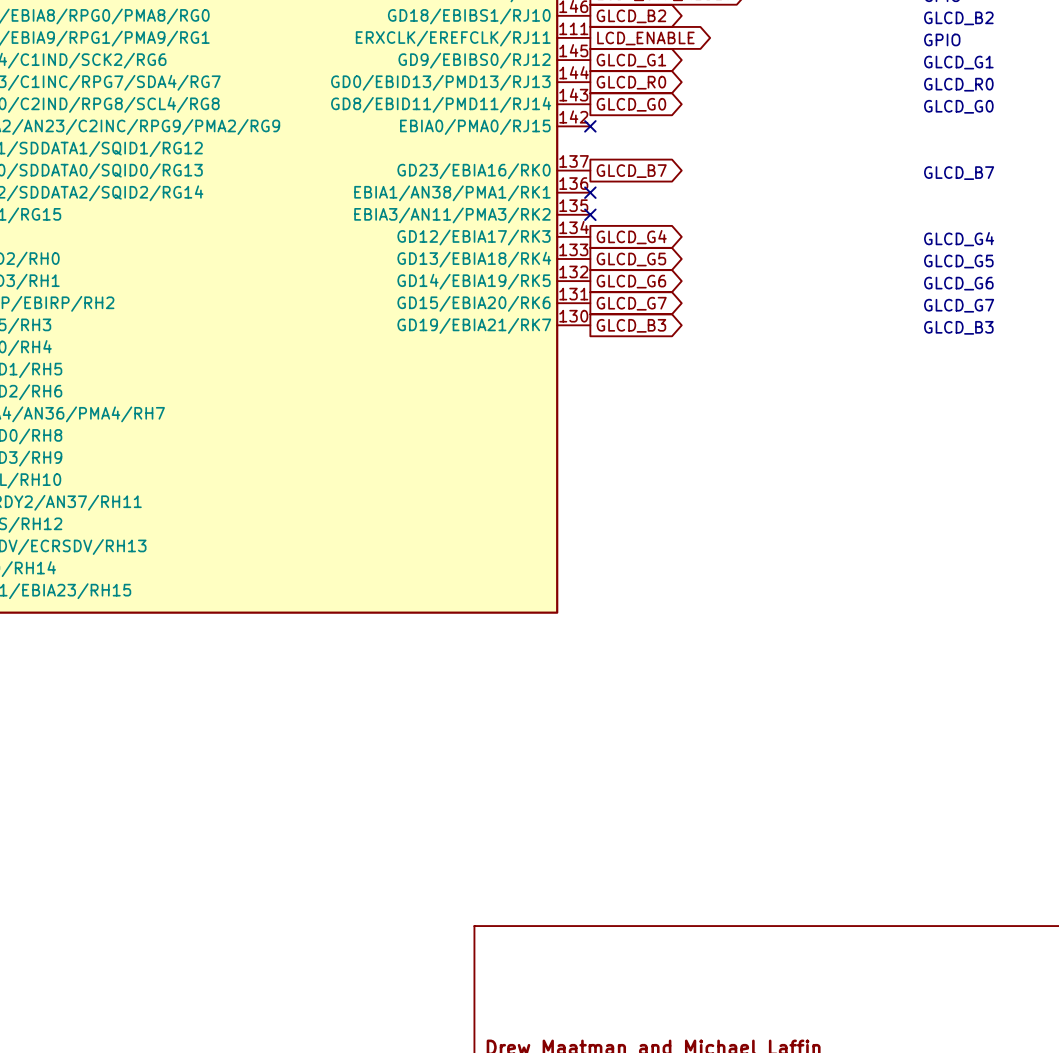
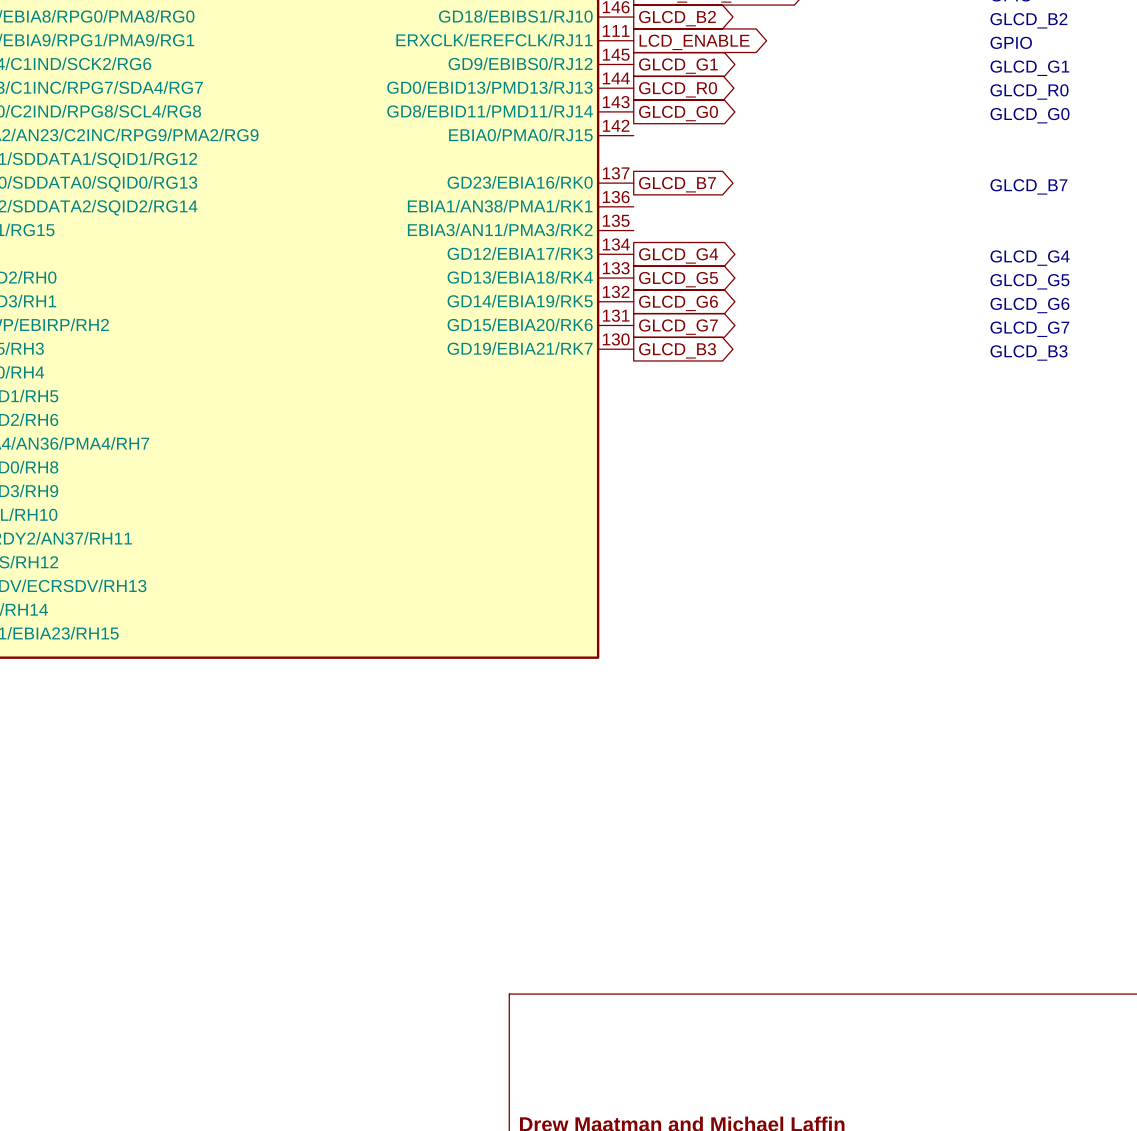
no-connect mark: (590, 126) -> none
no-connect mark: (590, 192) -> none
no-connect mark: (590, 214) -> none

